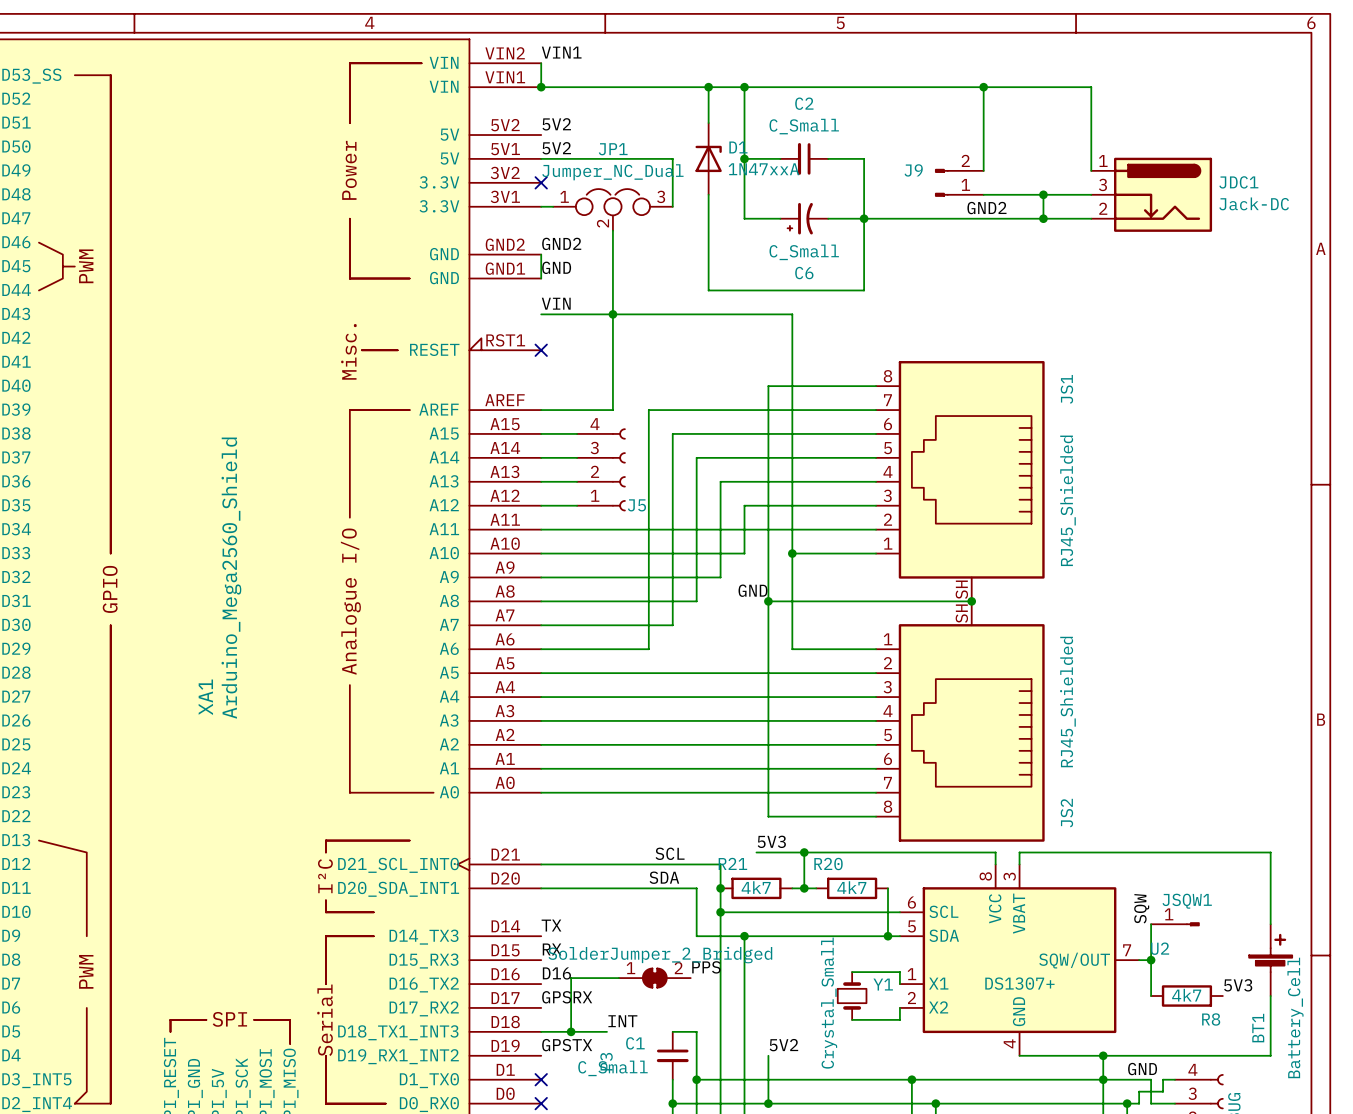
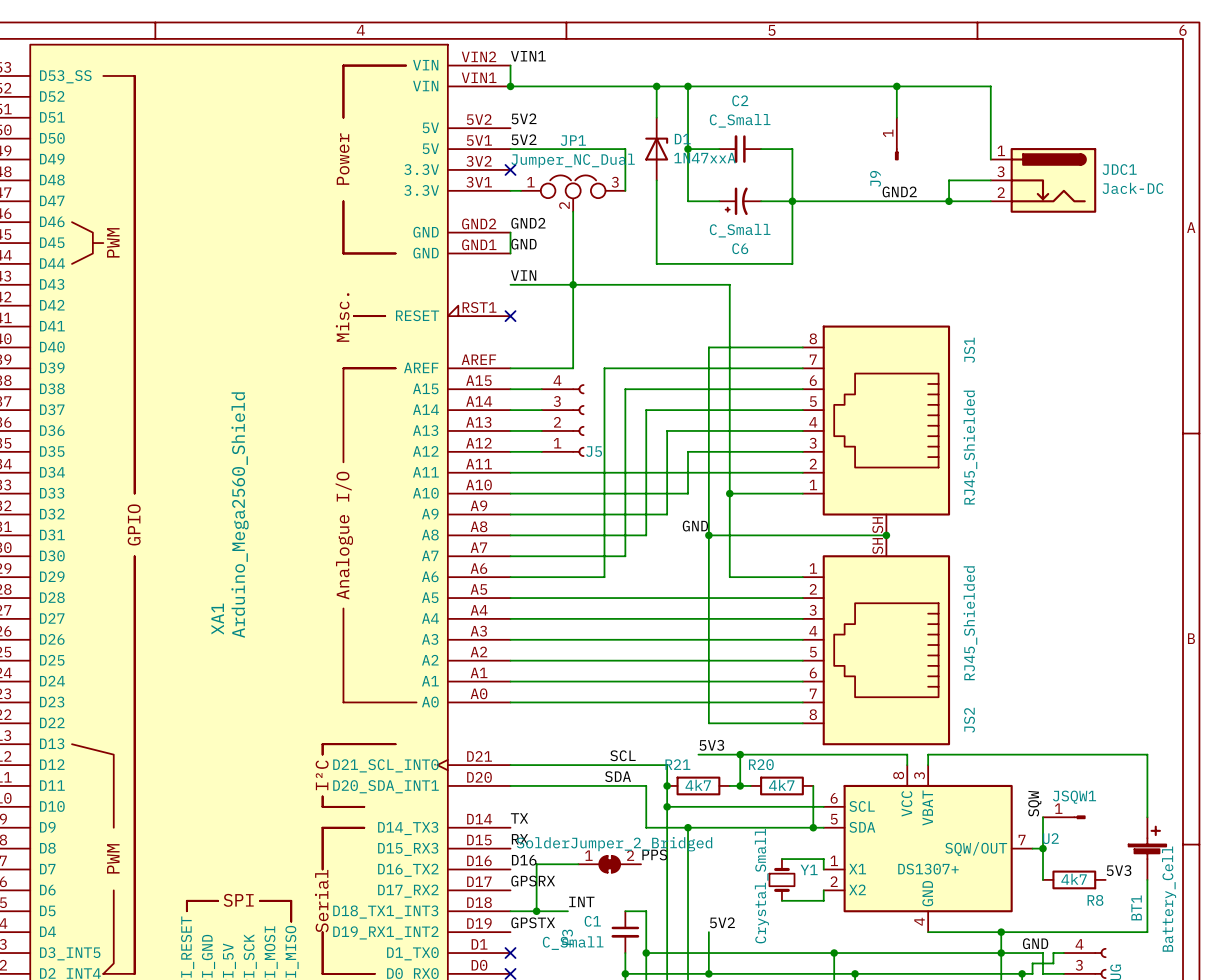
J9 symbol: [935, 168, 984, 197] -> [895, 117, 899, 161]
J9 name position: J9 (913, 170) -> J9 (875, 178)
wire: (983, 194) (1043, 194) -> none
junction: (1043, 194) -> none

